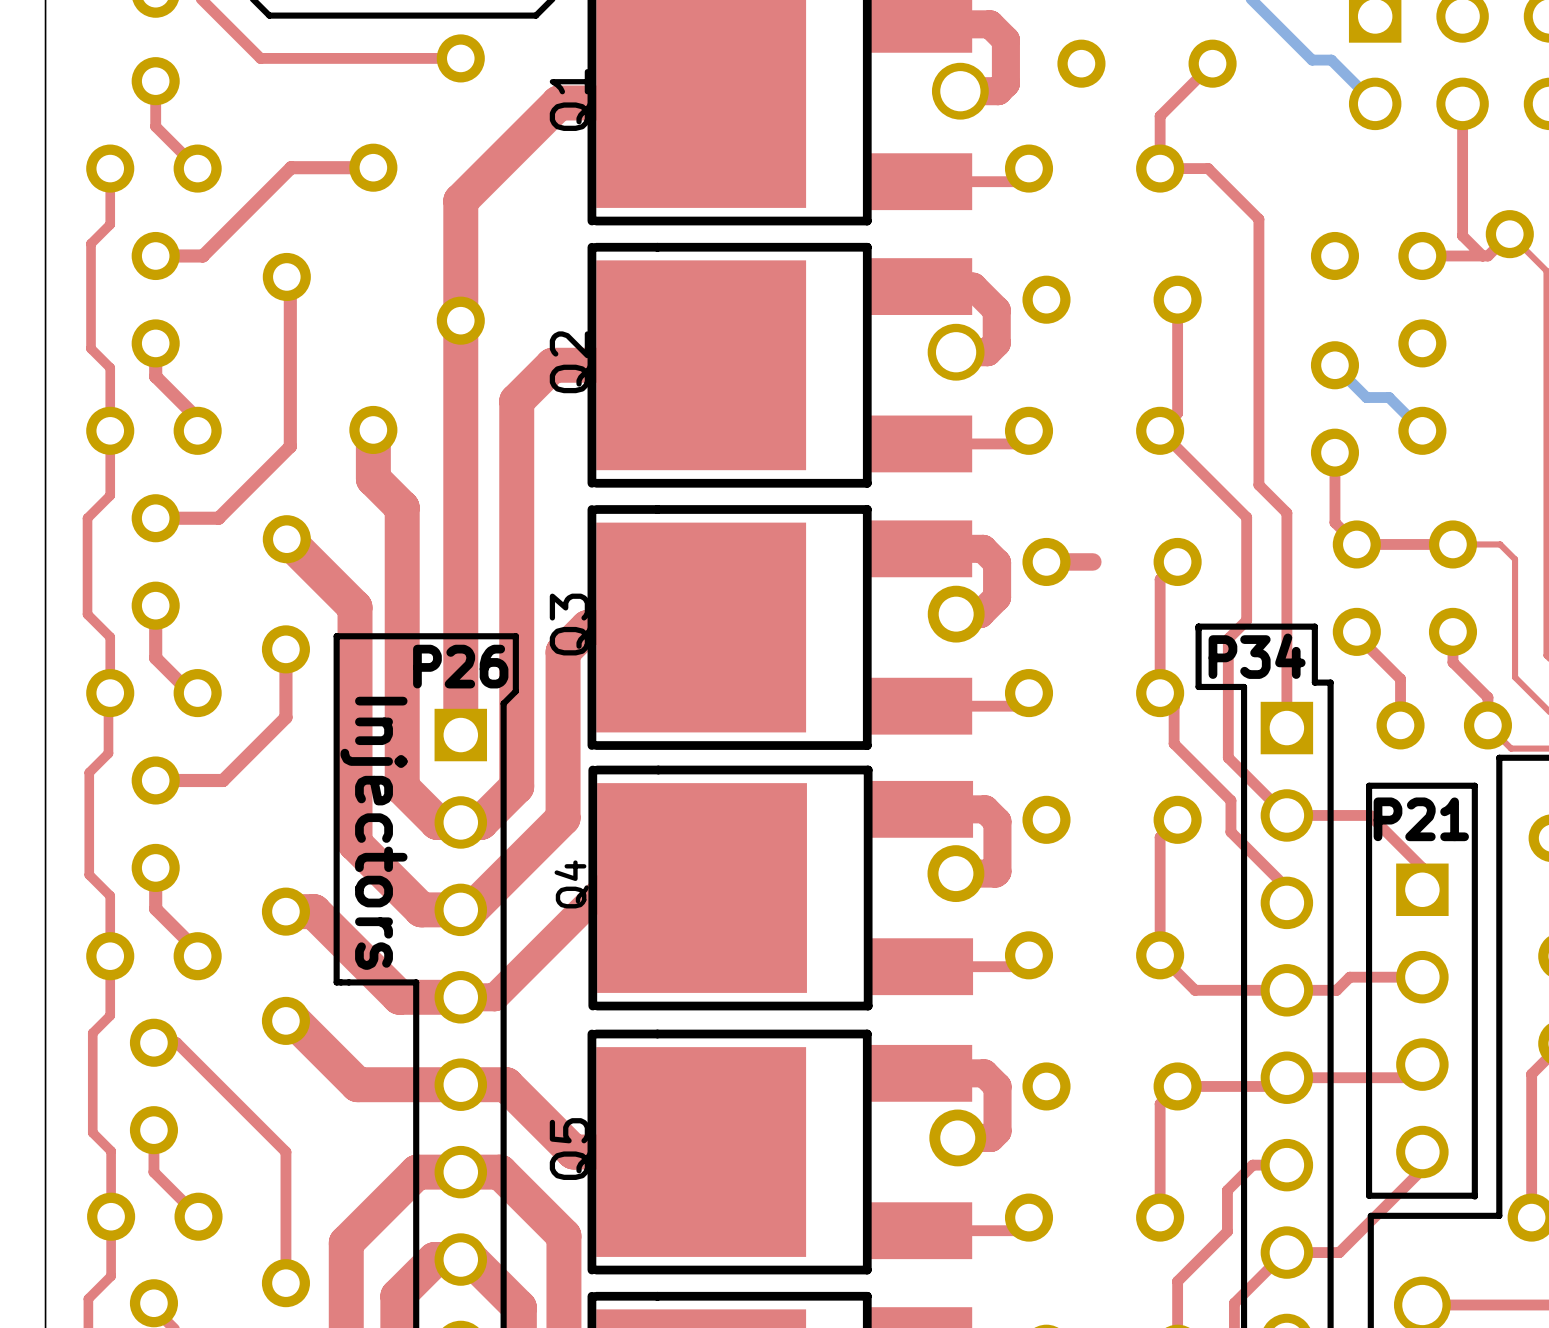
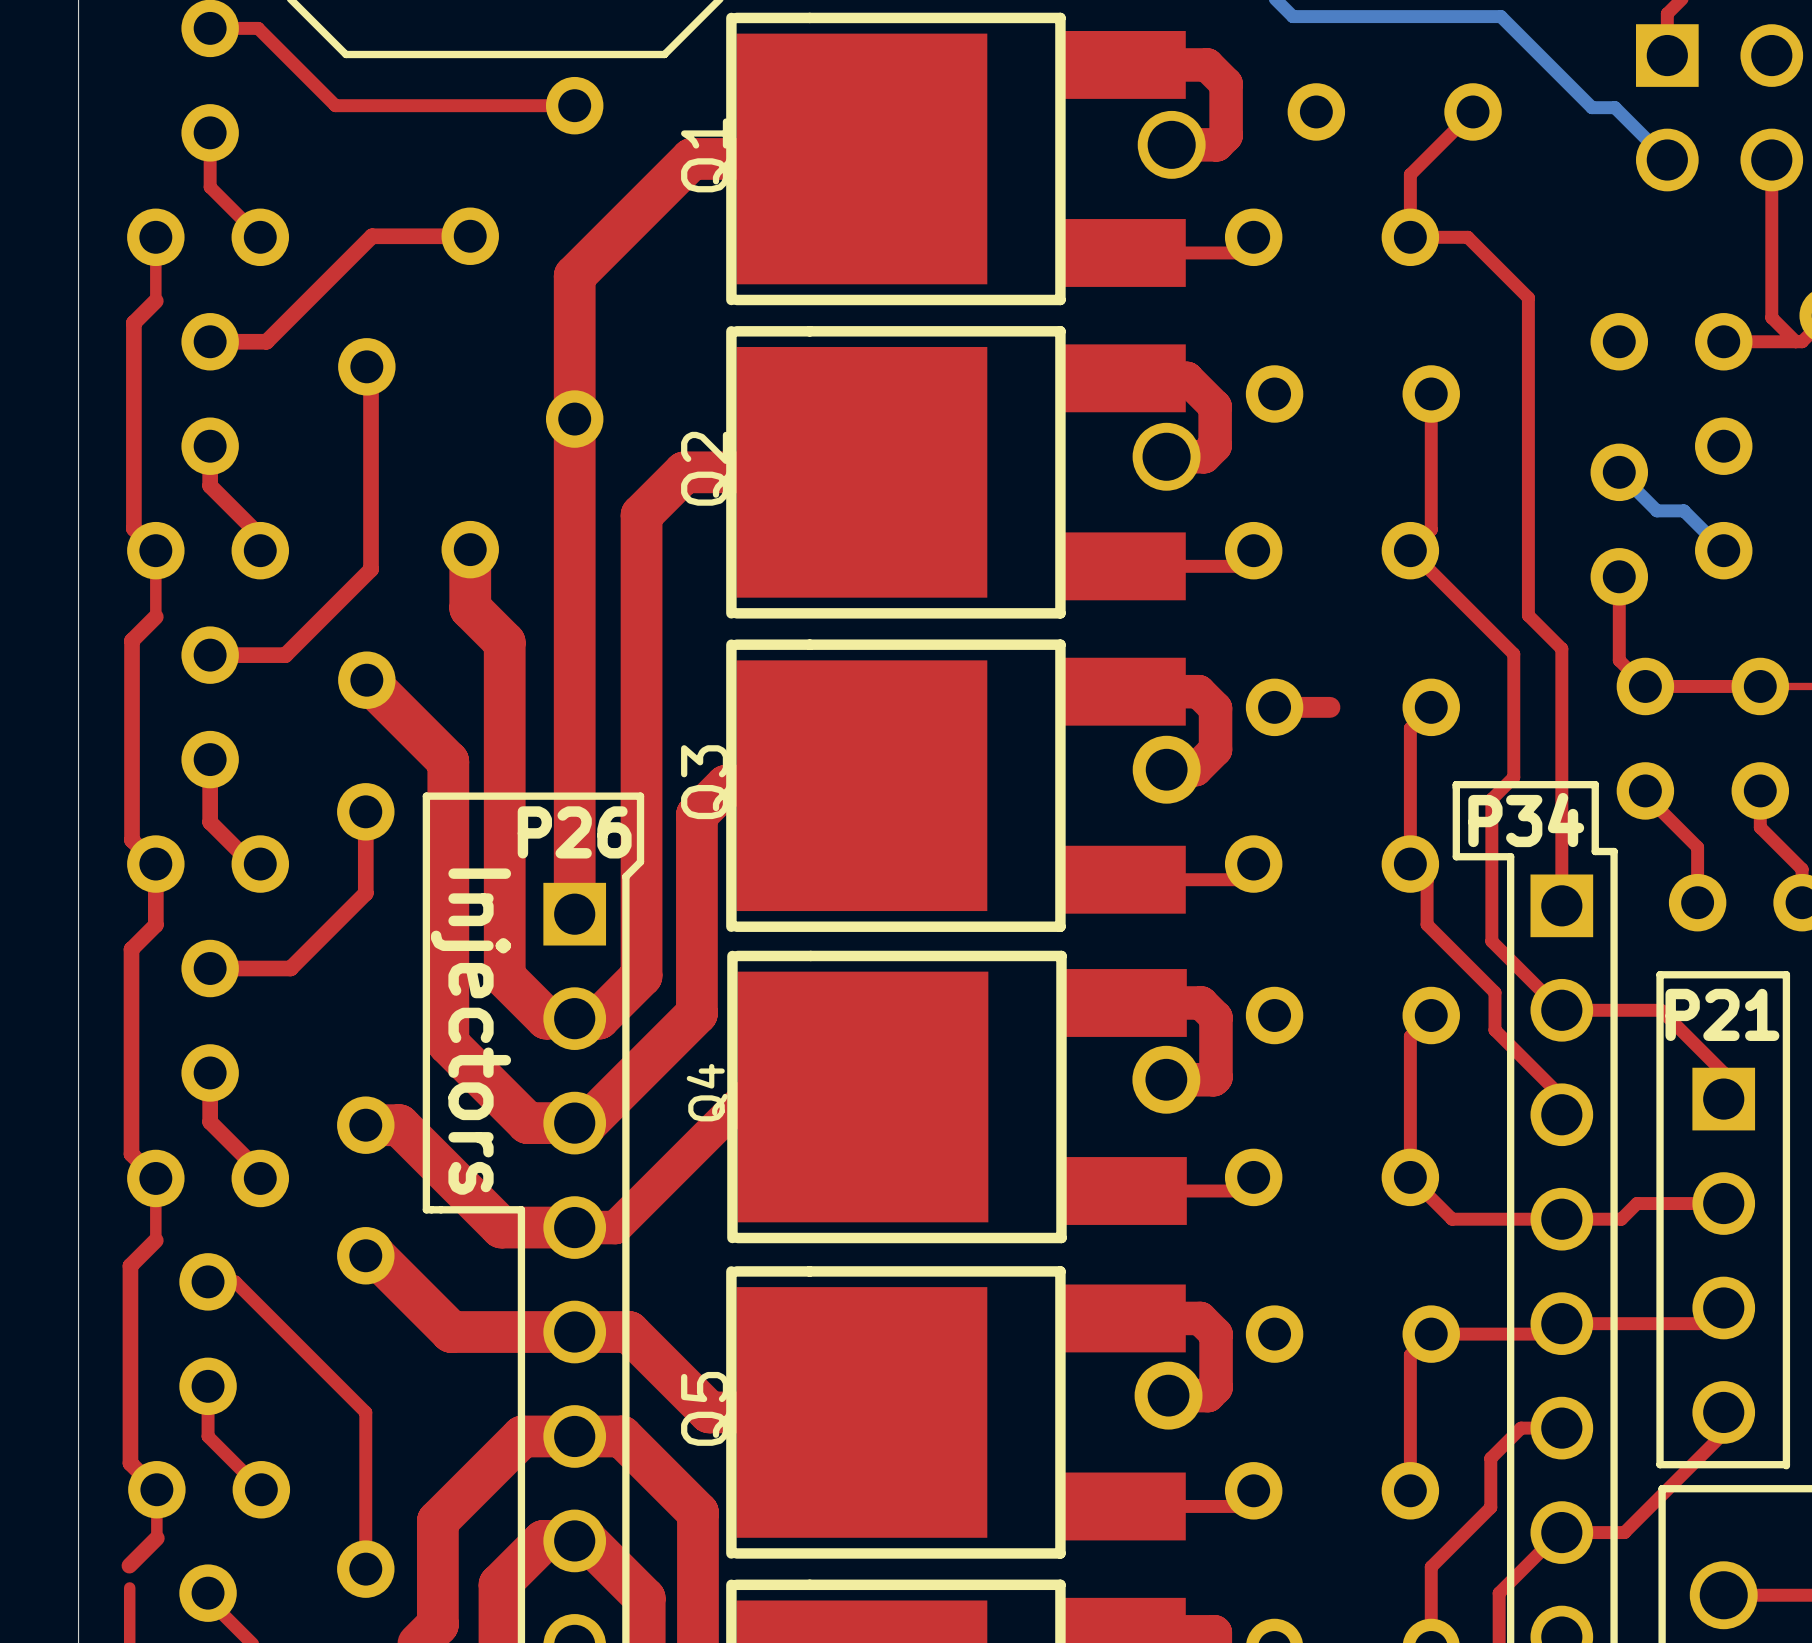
top track: (110, 221) (110, 224) (91, 243) (91, 348) (110, 367) (110, 430) -> (155, 301) (133, 322) (133, 528) (155, 550)
top track: (110, 486) (110, 495) (87, 518) (87, 614) (110, 637) (108, 753) (89, 772) (89, 874) (110, 895) (110, 956) -> (155, 616) (132, 640) (132, 840) (155, 864) (155, 925) (131, 949) (131, 1154) (155, 1178)
top track: (110, 1008) (110, 1015) (92, 1033) (92, 1132) (111, 1151) (111, 1216) -> (155, 1240) (130, 1265) (130, 1463) (156, 1489)
top track: (111, 1257) (111, 1276) (88, 1298) -> (156, 1538) (129, 1565)

